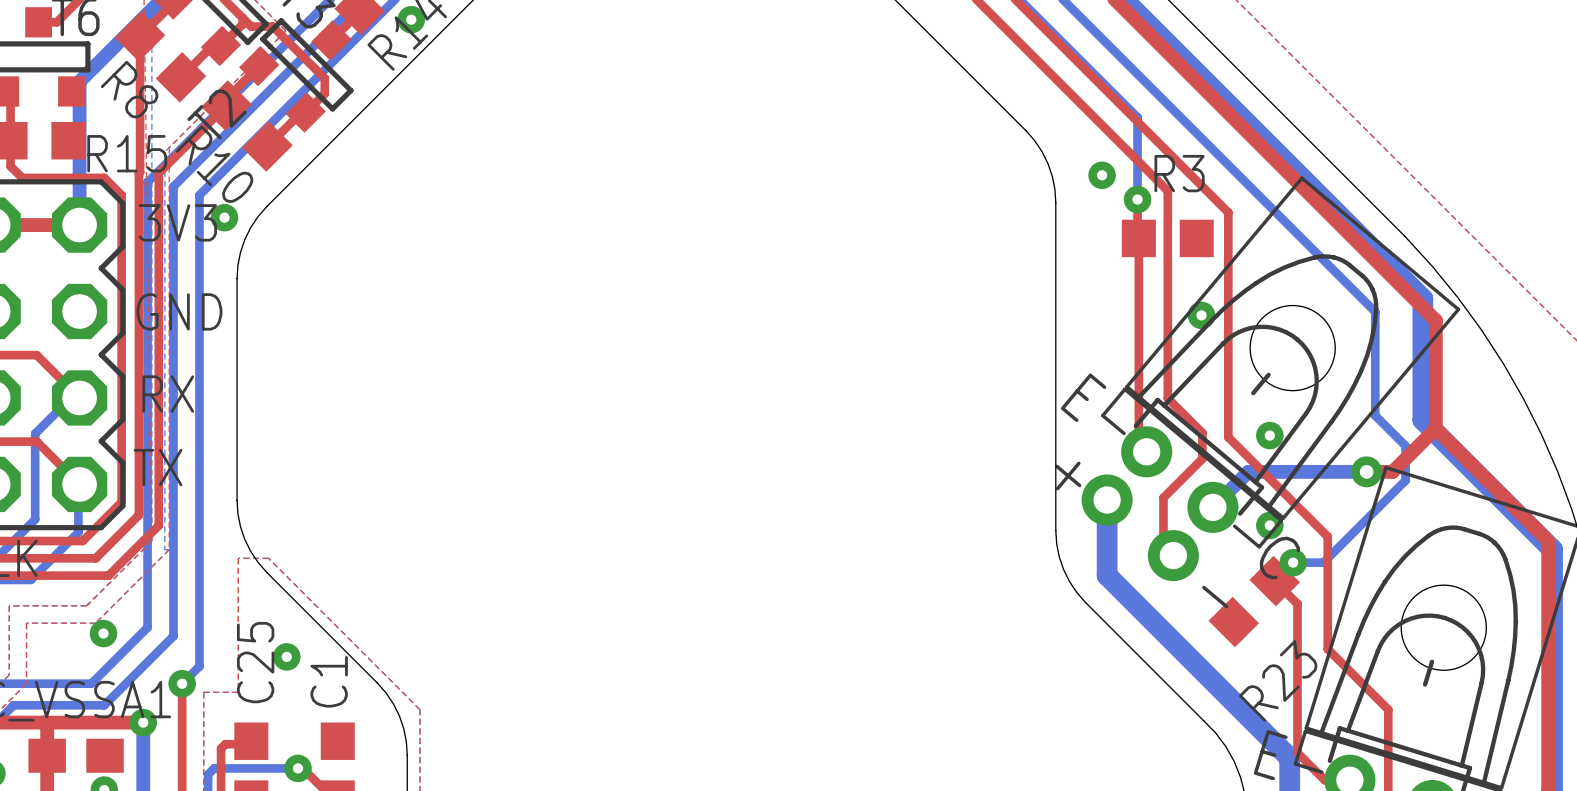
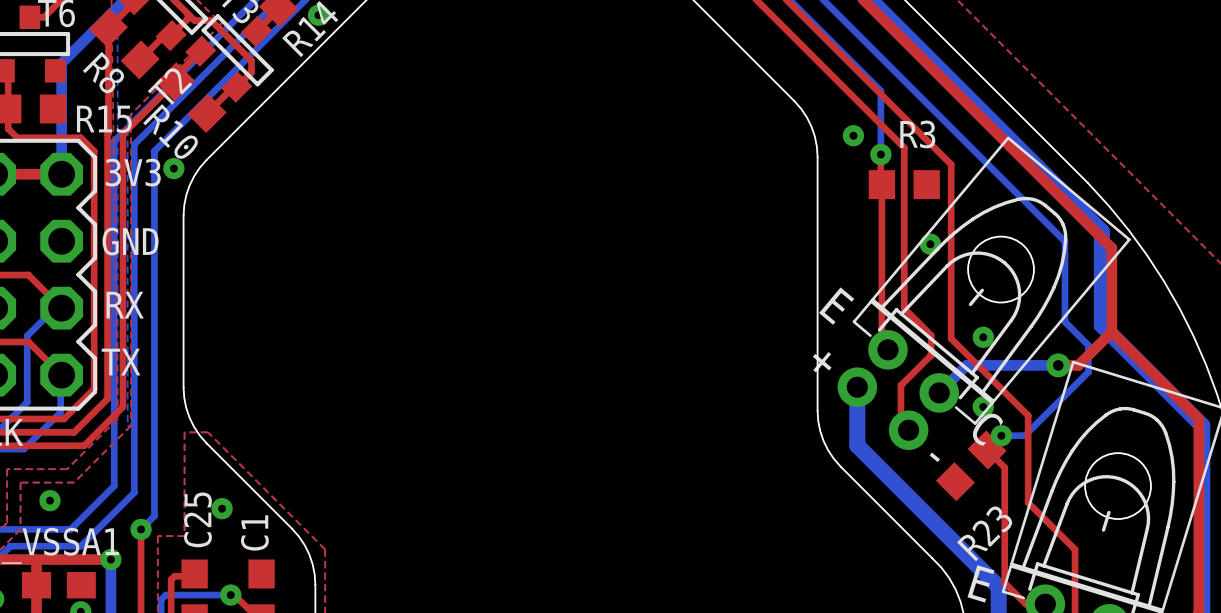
via position: (103, 633) -> (50, 500)

